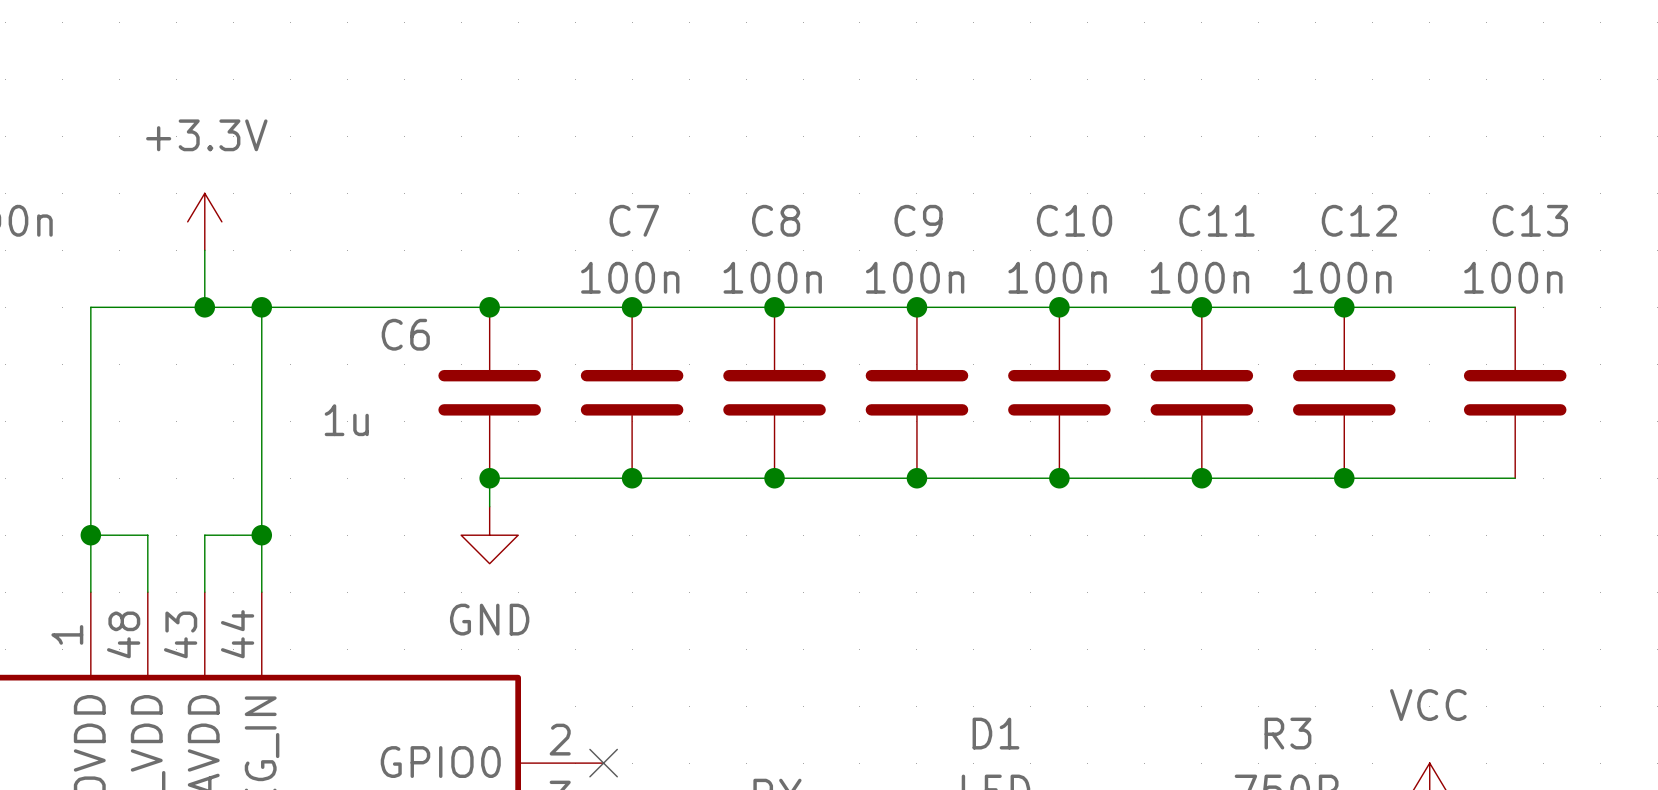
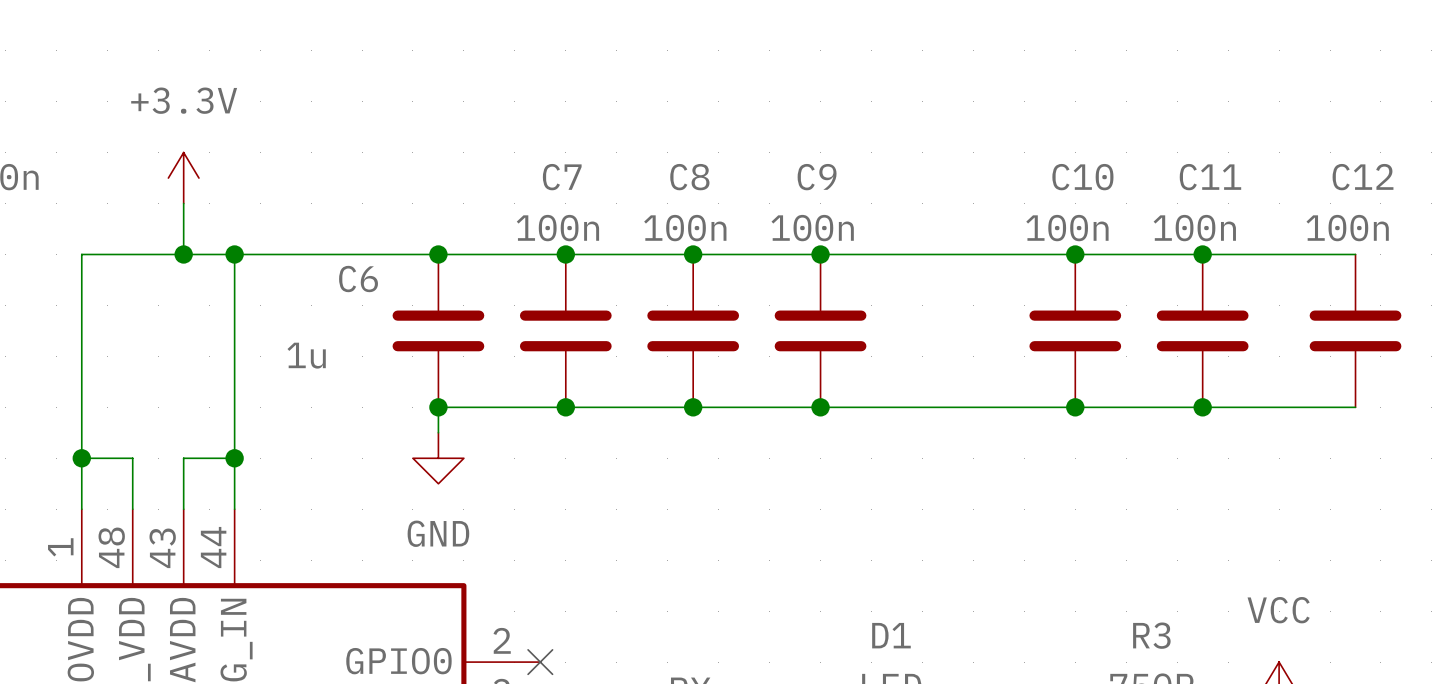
C11 name: C11 (1216, 220) -> C10 (1082, 177)
C12 name: C12 (1359, 220) -> C11 (1210, 177)
C13 name: C13 (1530, 220) -> C12 (1363, 177)
junction: (1059, 307) -> none
C10: 100n (1059, 392) -> none
junction: (1059, 478) -> none

